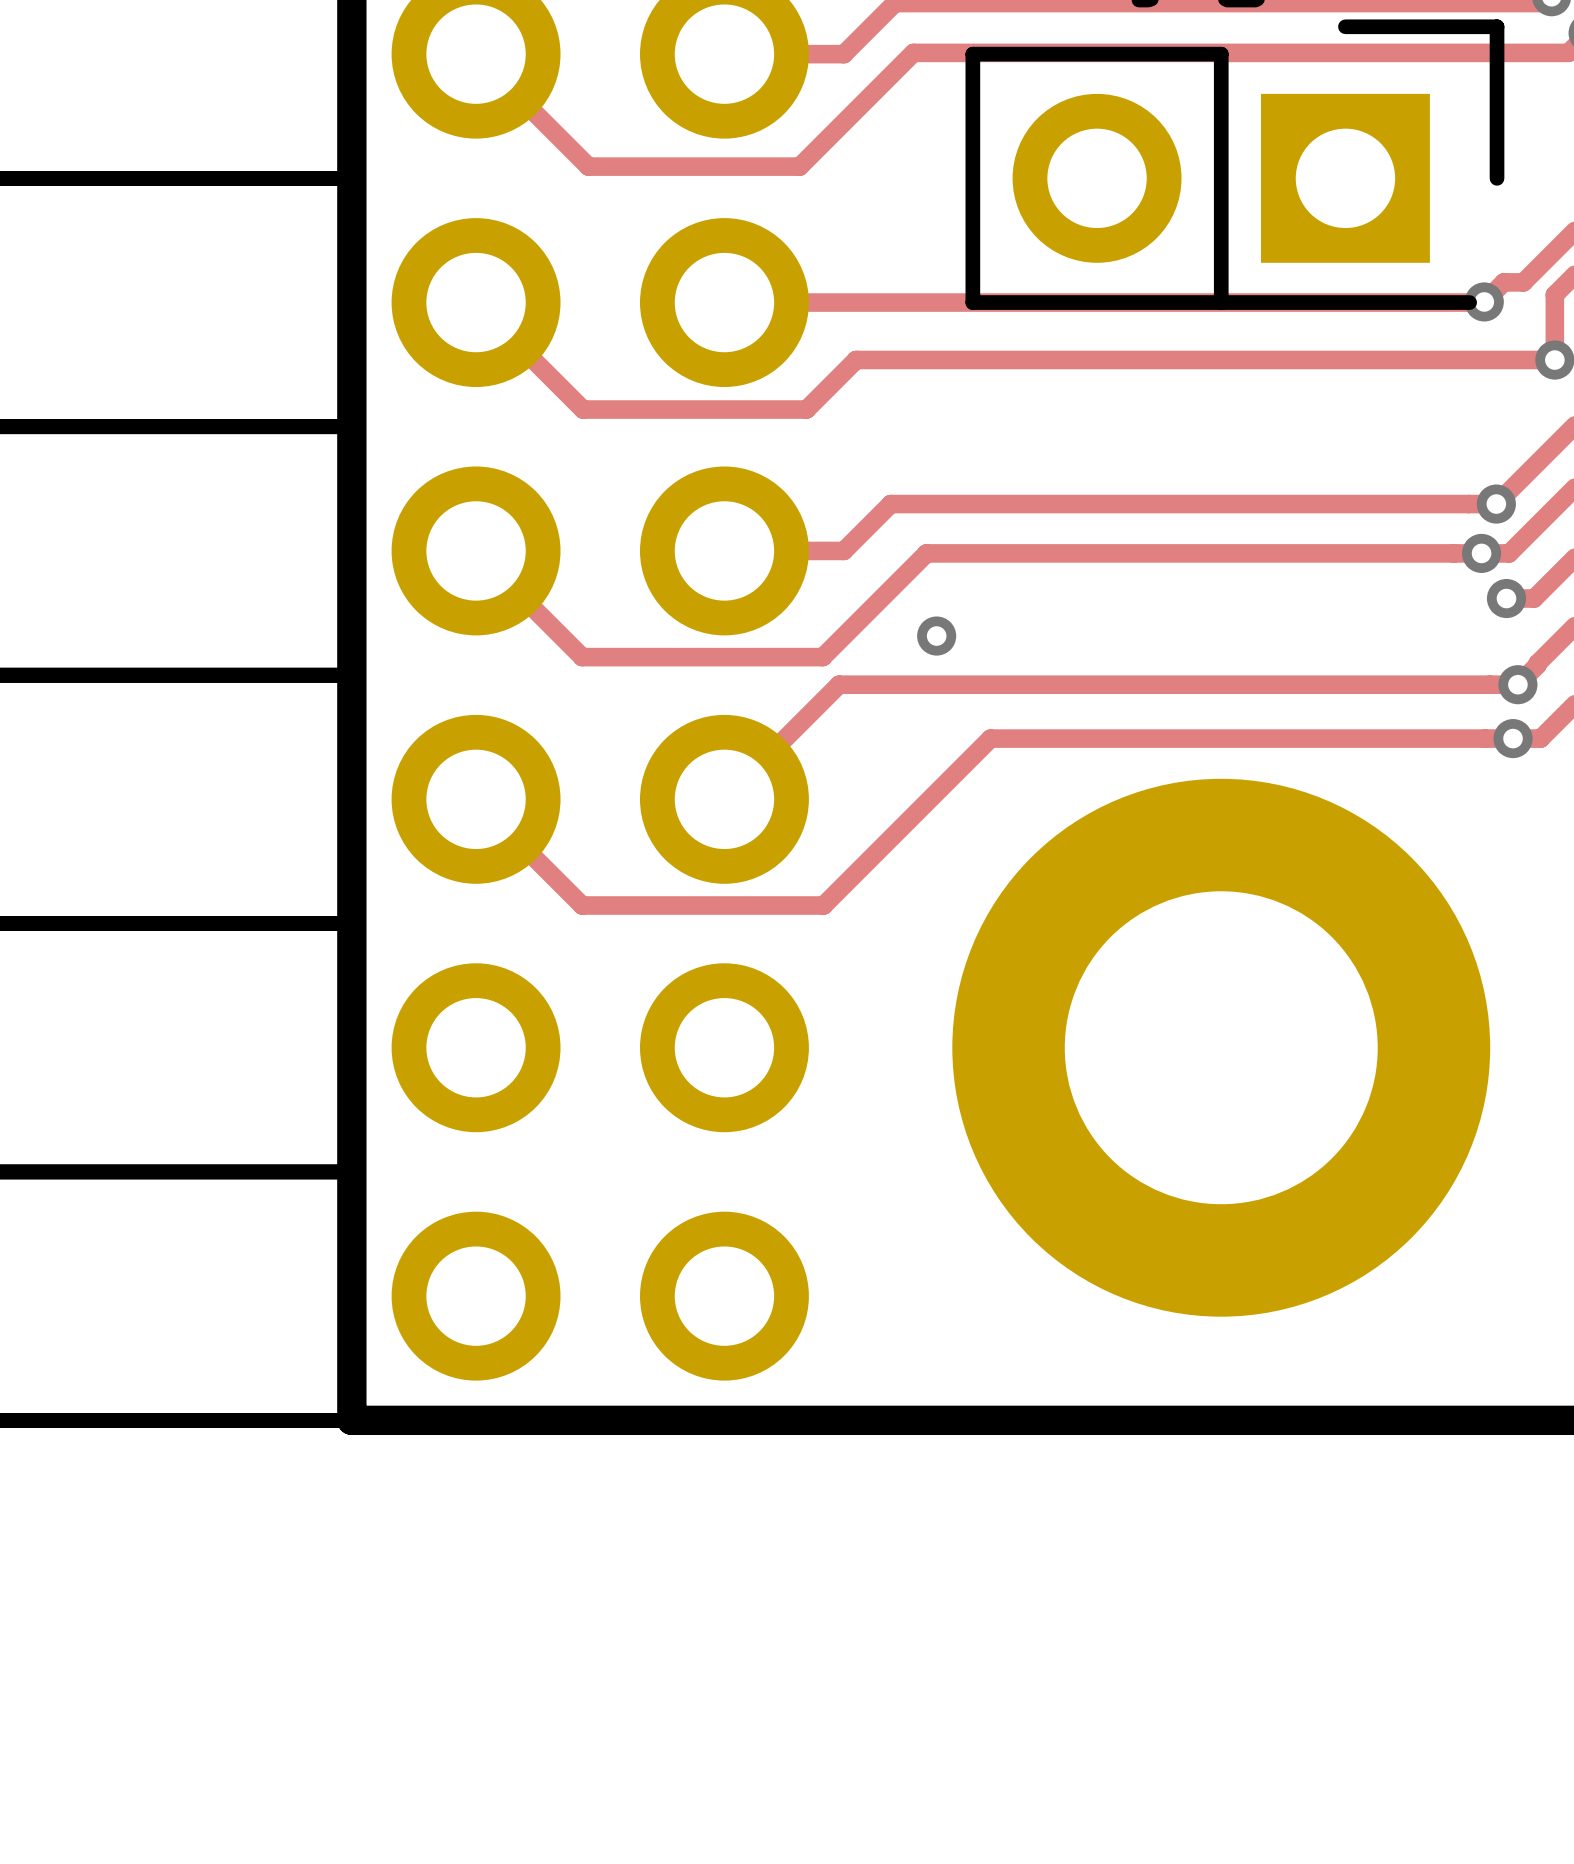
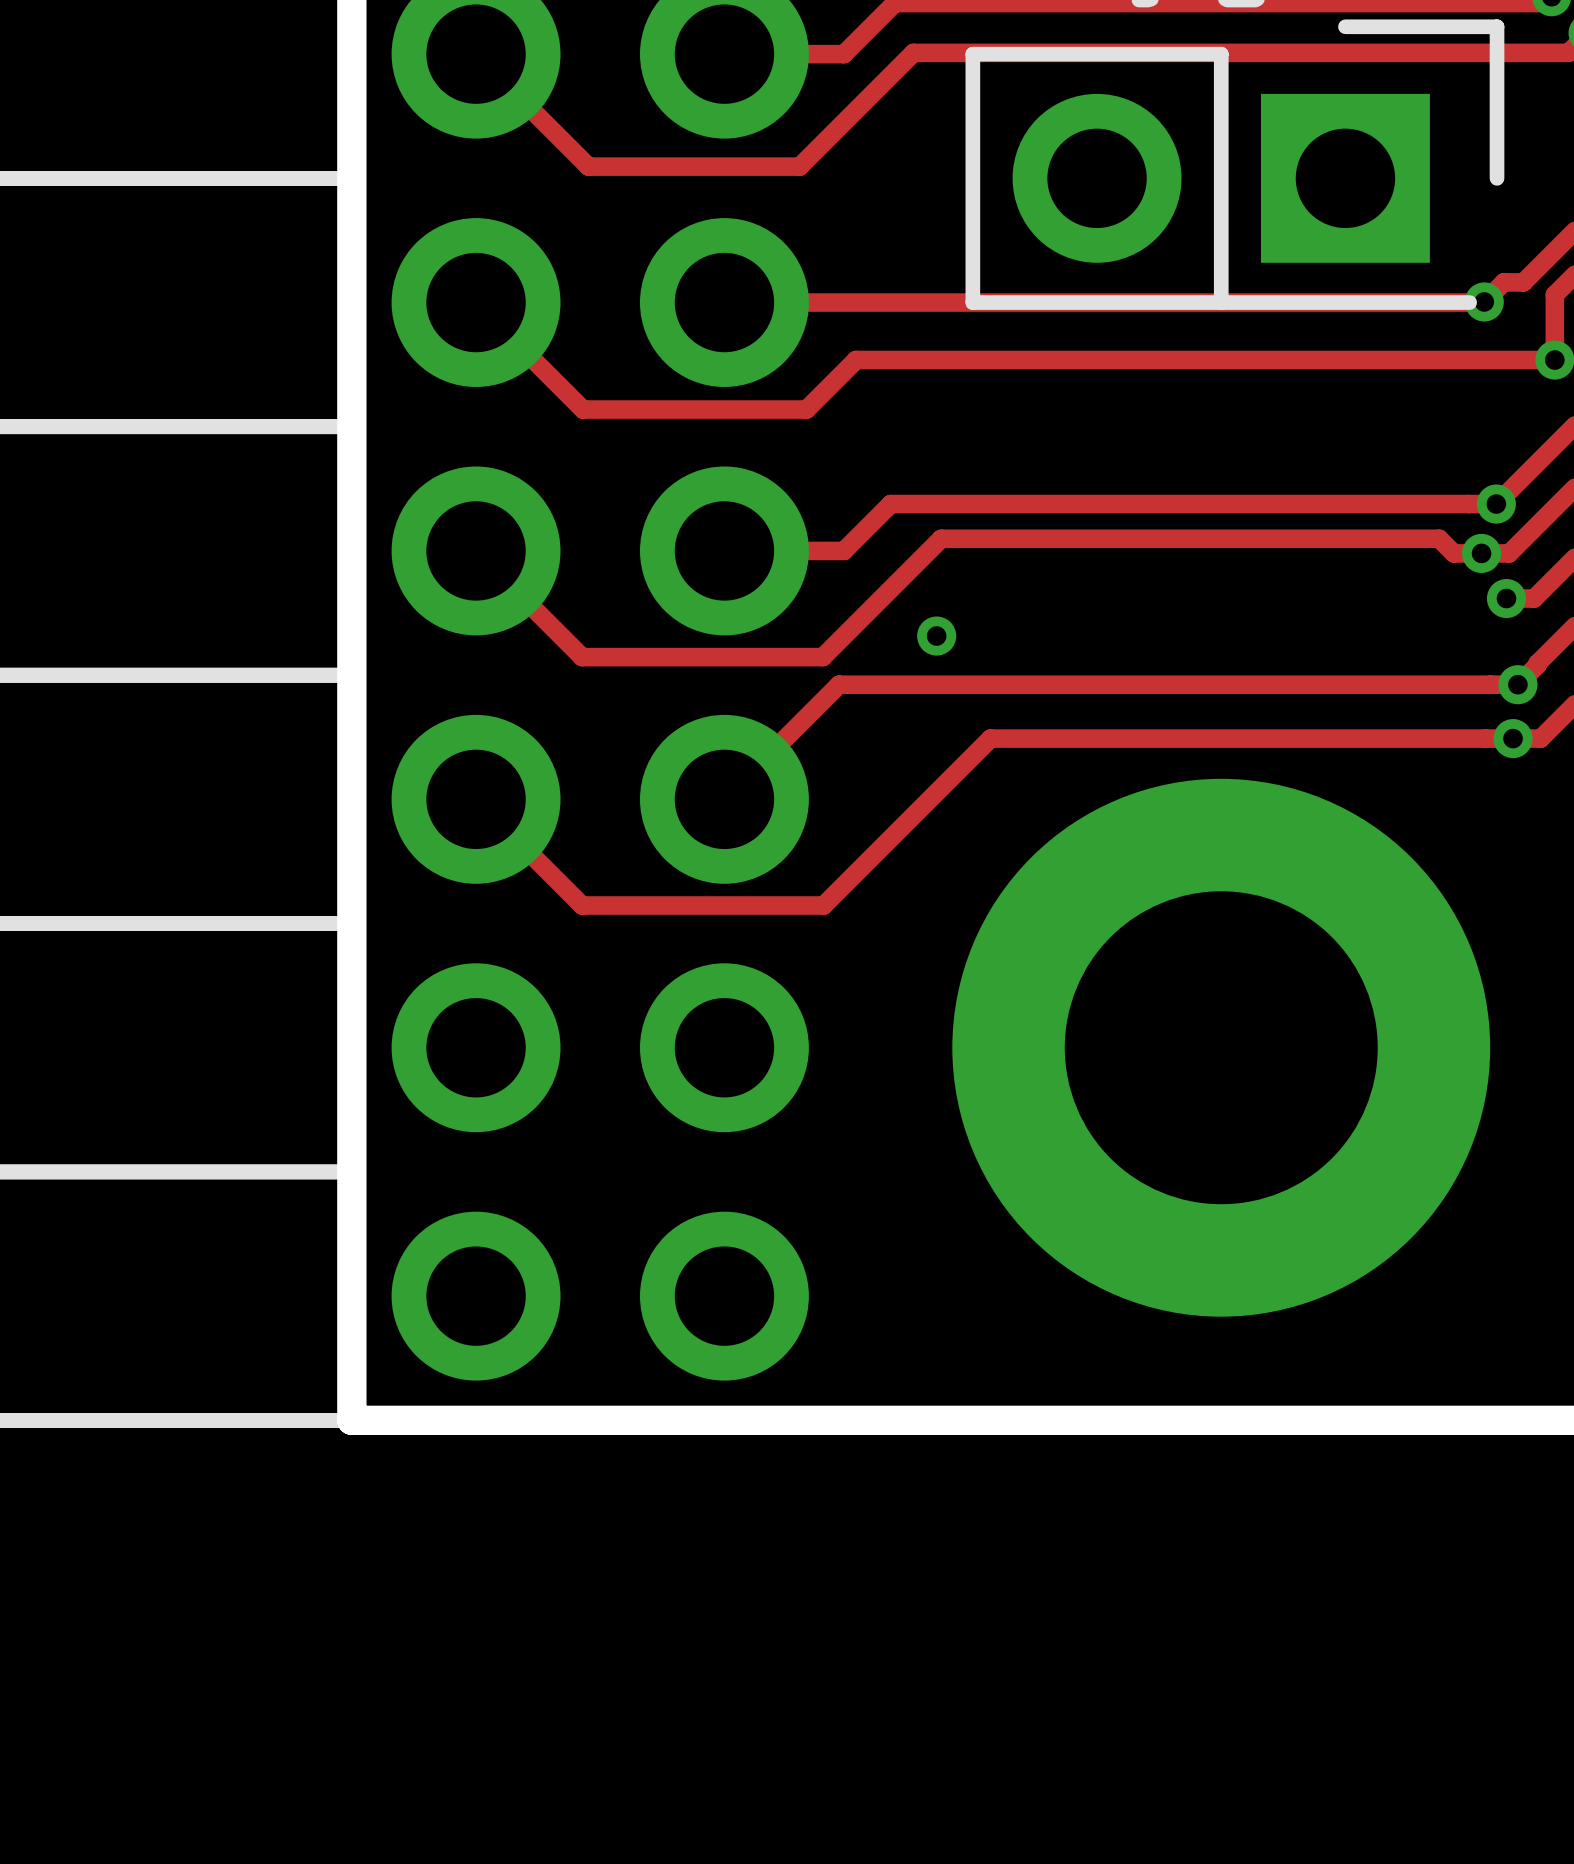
track: (926, 553) (1453, 553) -> (926, 553) (941, 538) (1439, 538) (1453, 553)

